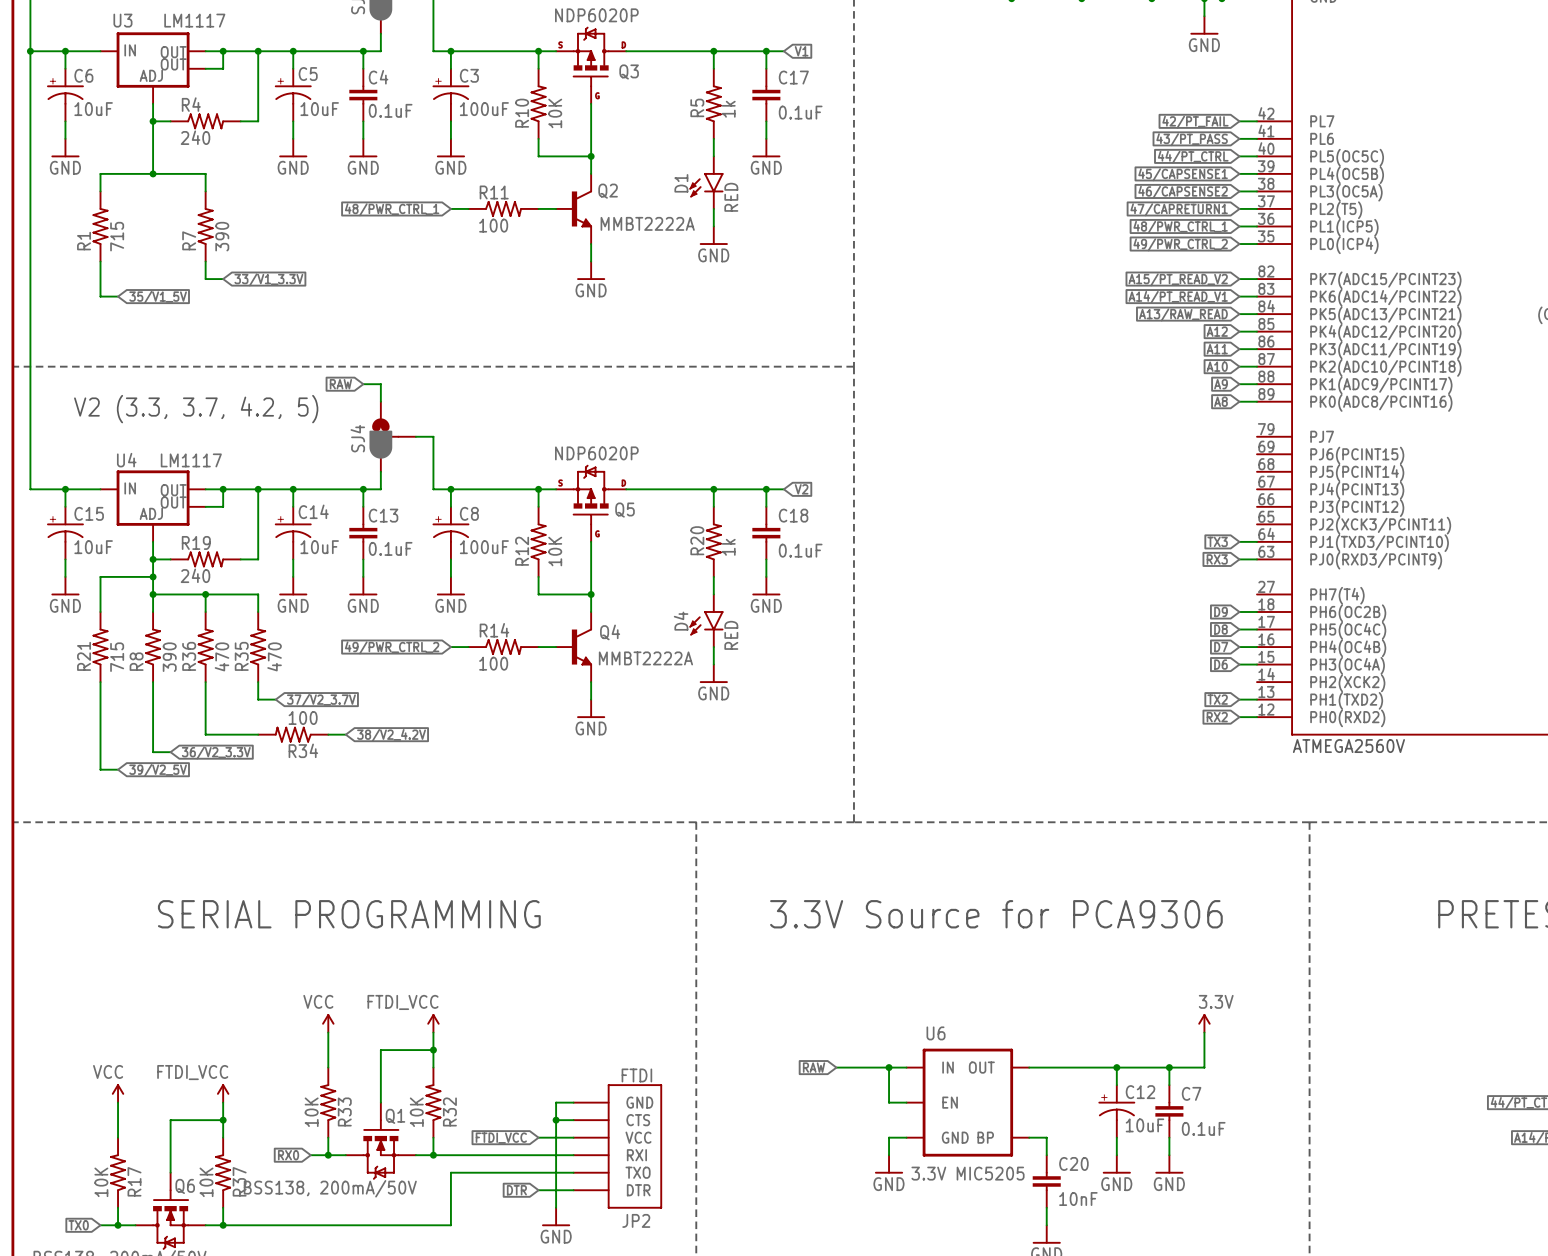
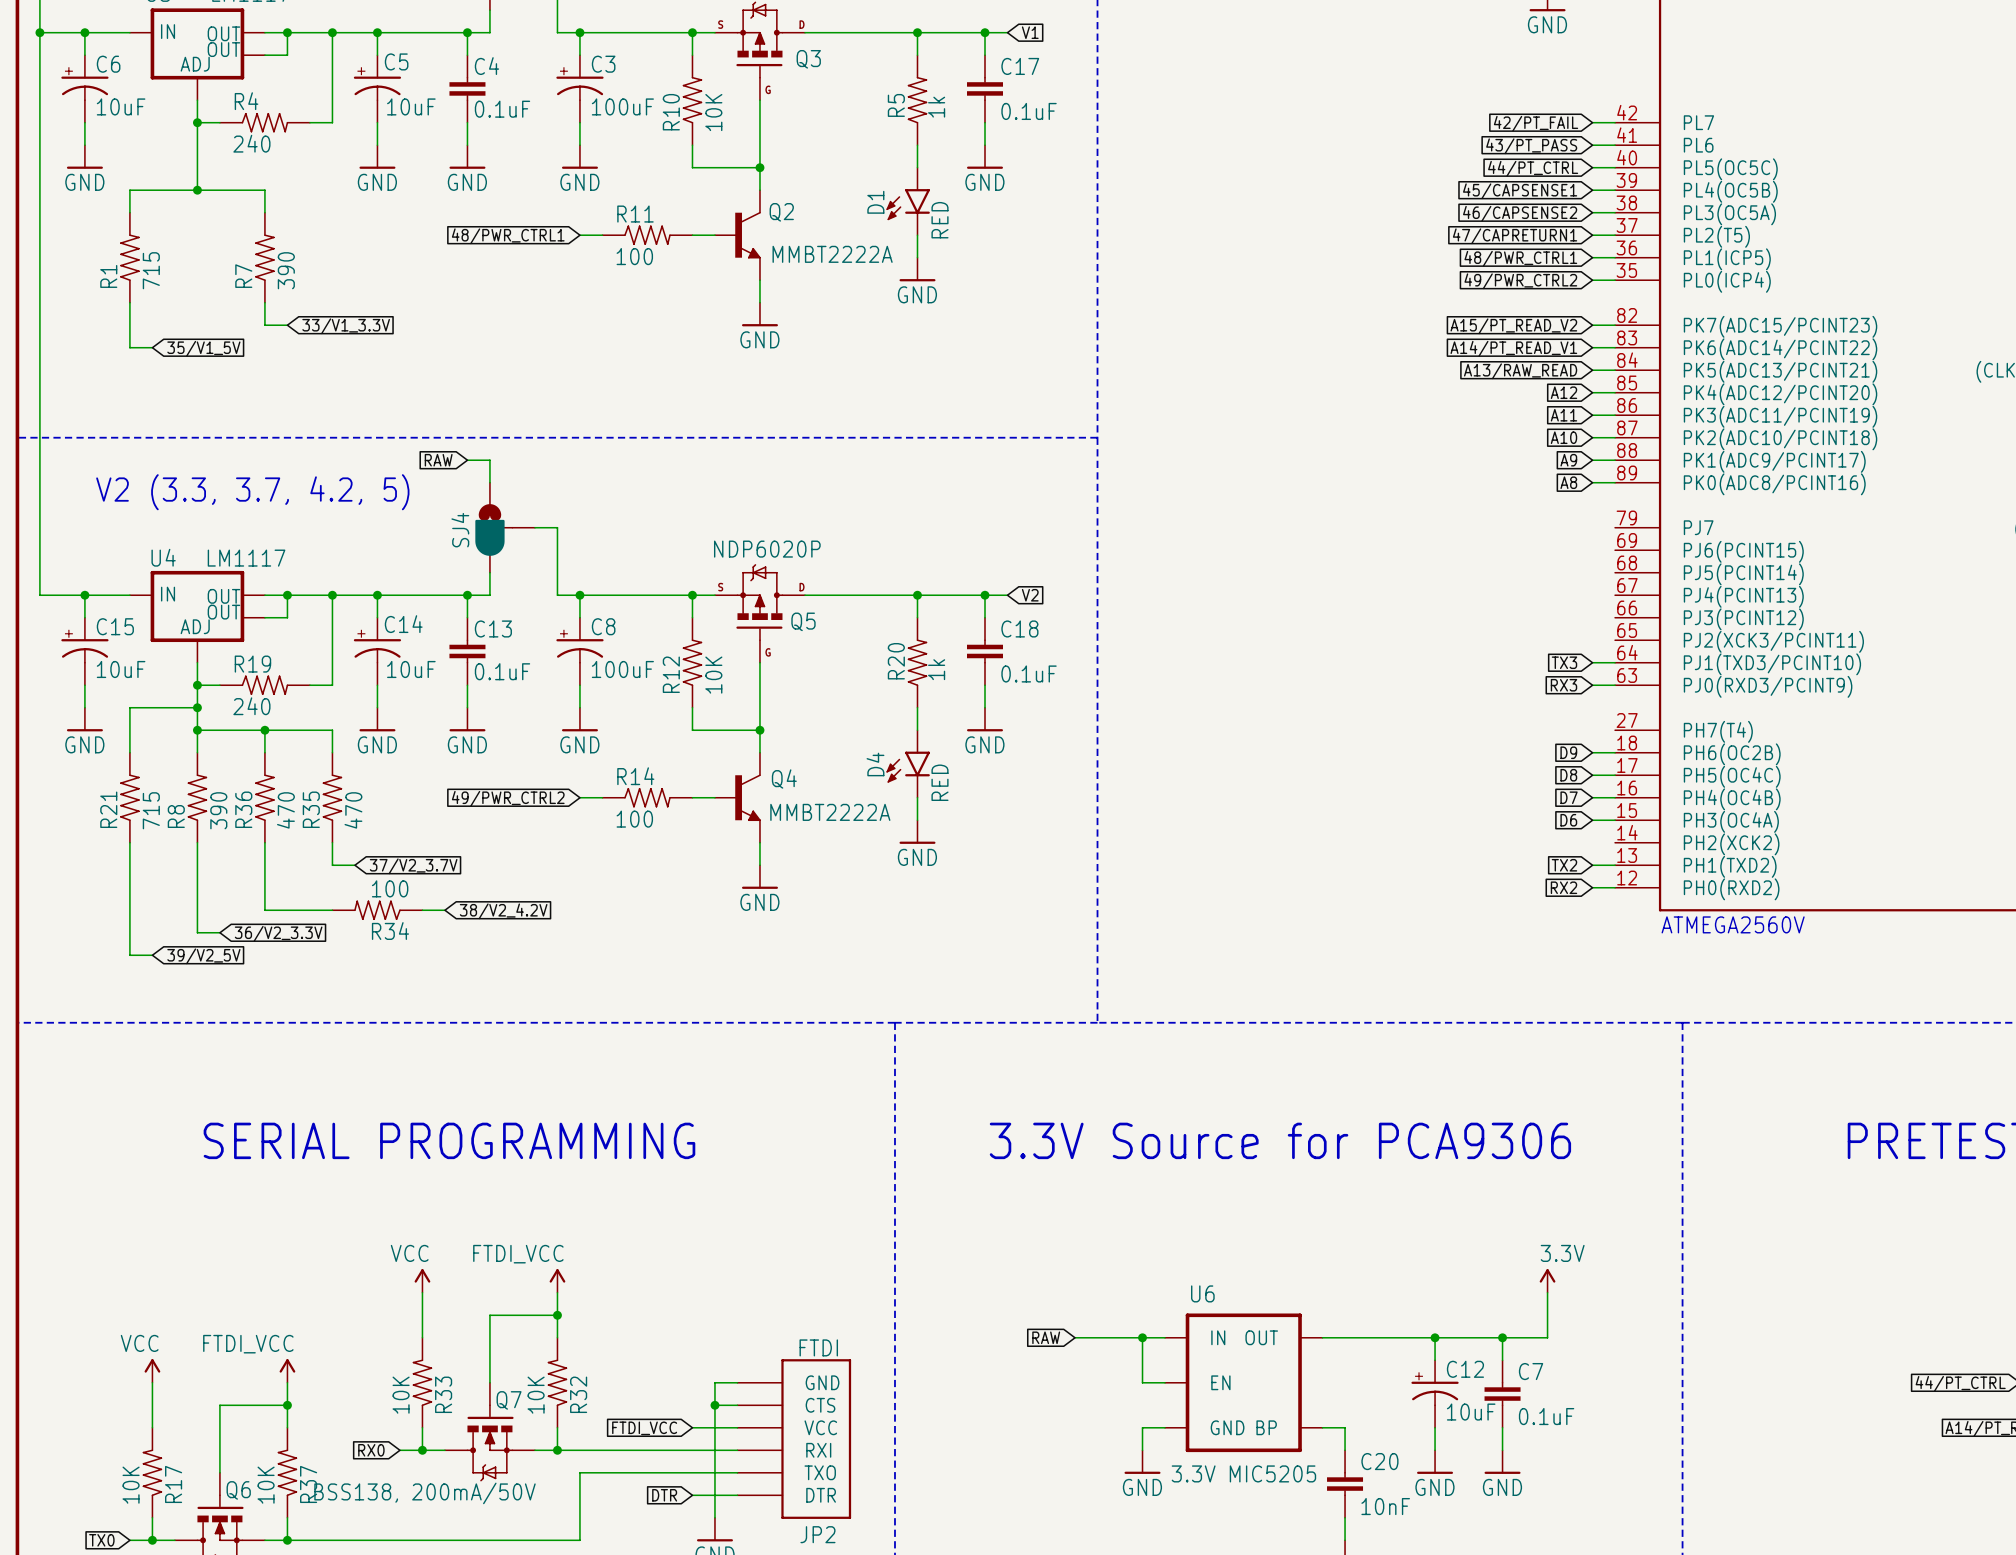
global label: 48/PWR_CTRL_1 (392, 209) -> 48/PWR_CTRL1 (508, 236)
global label: 48/PWR_CTRL_1 (1180, 227) -> 48/PWR_CTRL1 (1520, 258)
global label: 49/PWR_CTRL_2 (1180, 244) -> 49/PWR_CTRL2 (1520, 281)
global label: 49/PWR_CTRL_2 (392, 647) -> 49/PWR_CTRL2 (508, 798)
Q1 name: Q1 (395, 1116) -> Q7 (509, 1400)

